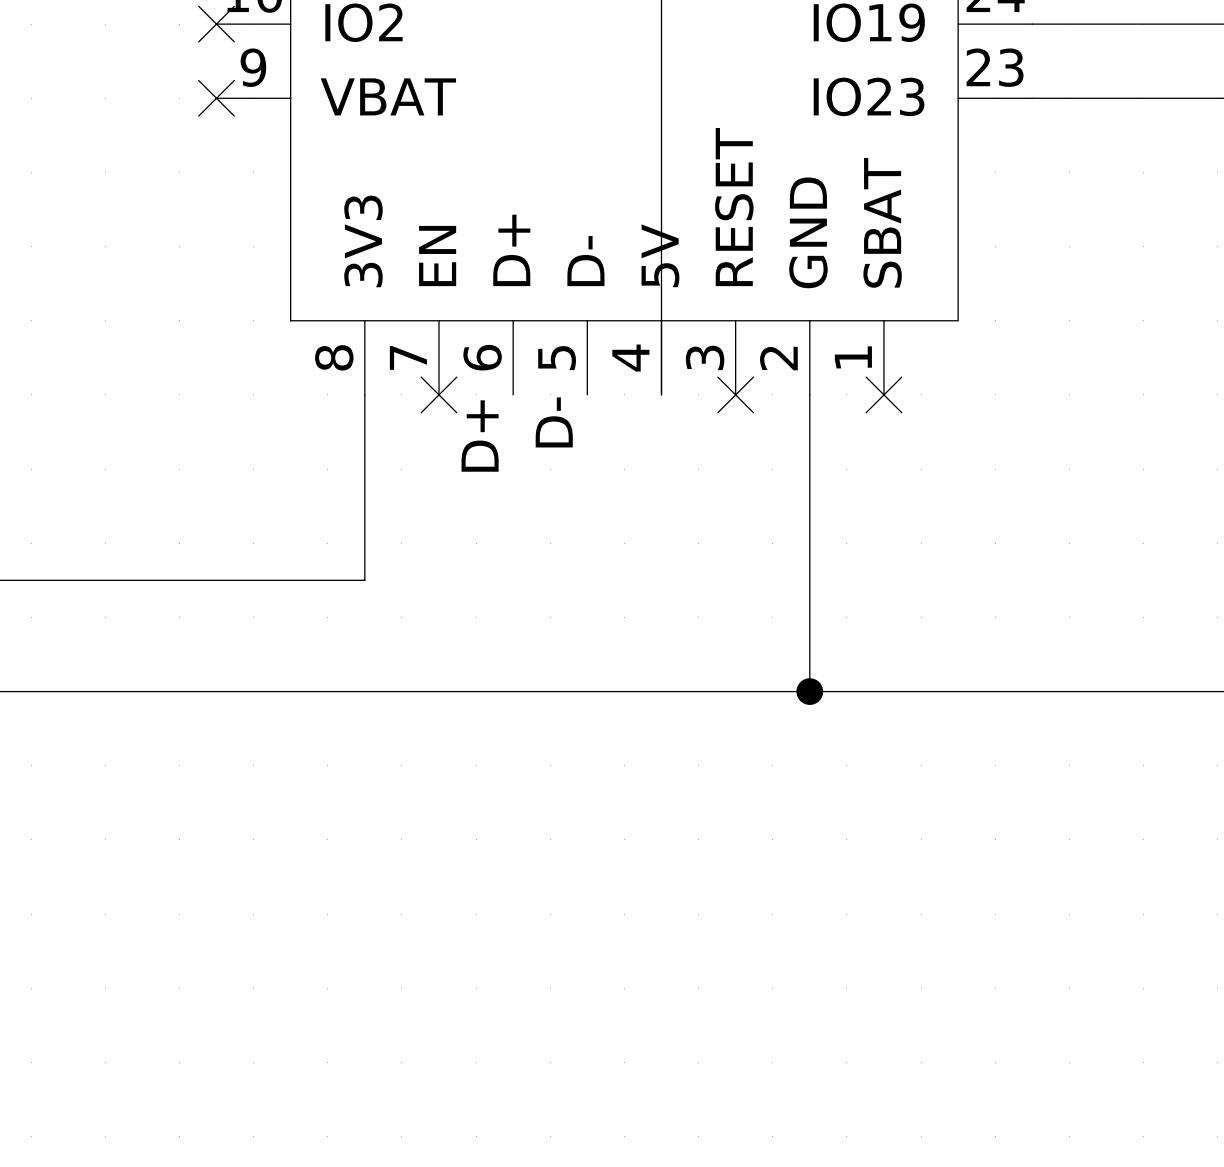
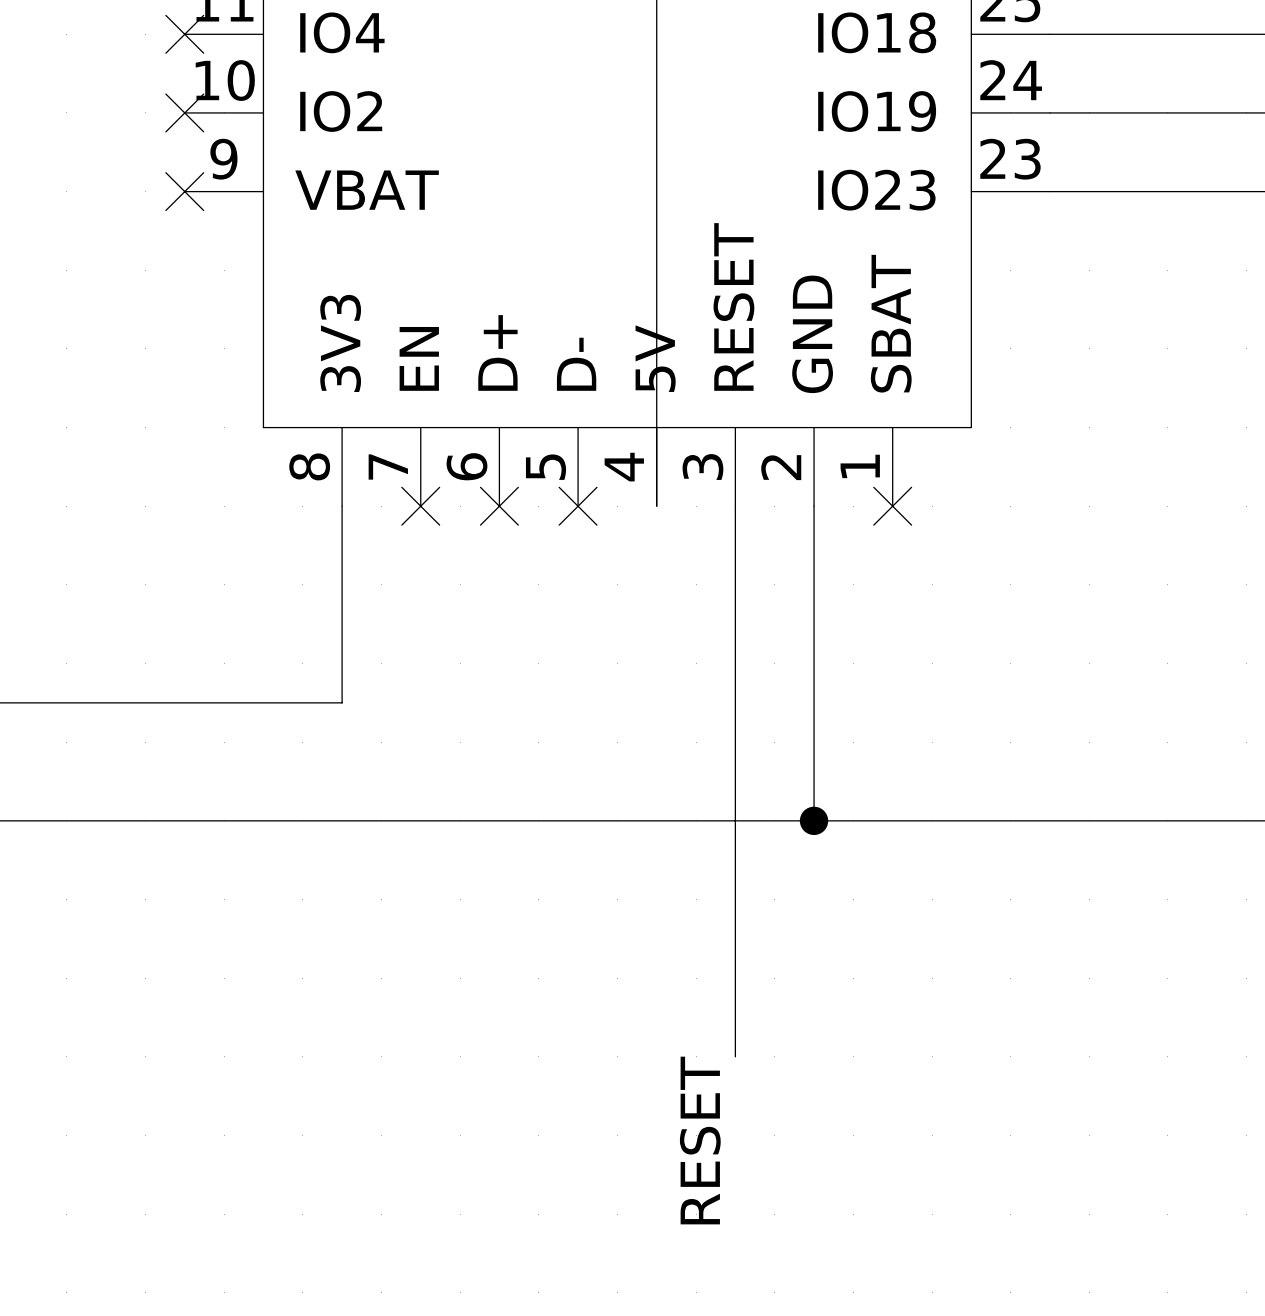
no-connect mark: none -> (499, 506)
no-connect mark: none -> (578, 506)
wire: none -> (735, 506) (735, 1056)
no-connect mark: (735, 394) -> none
label: D- (554, 422) -> none
label: D+ (480, 436) -> none
label: none -> RESET (700, 1140)

